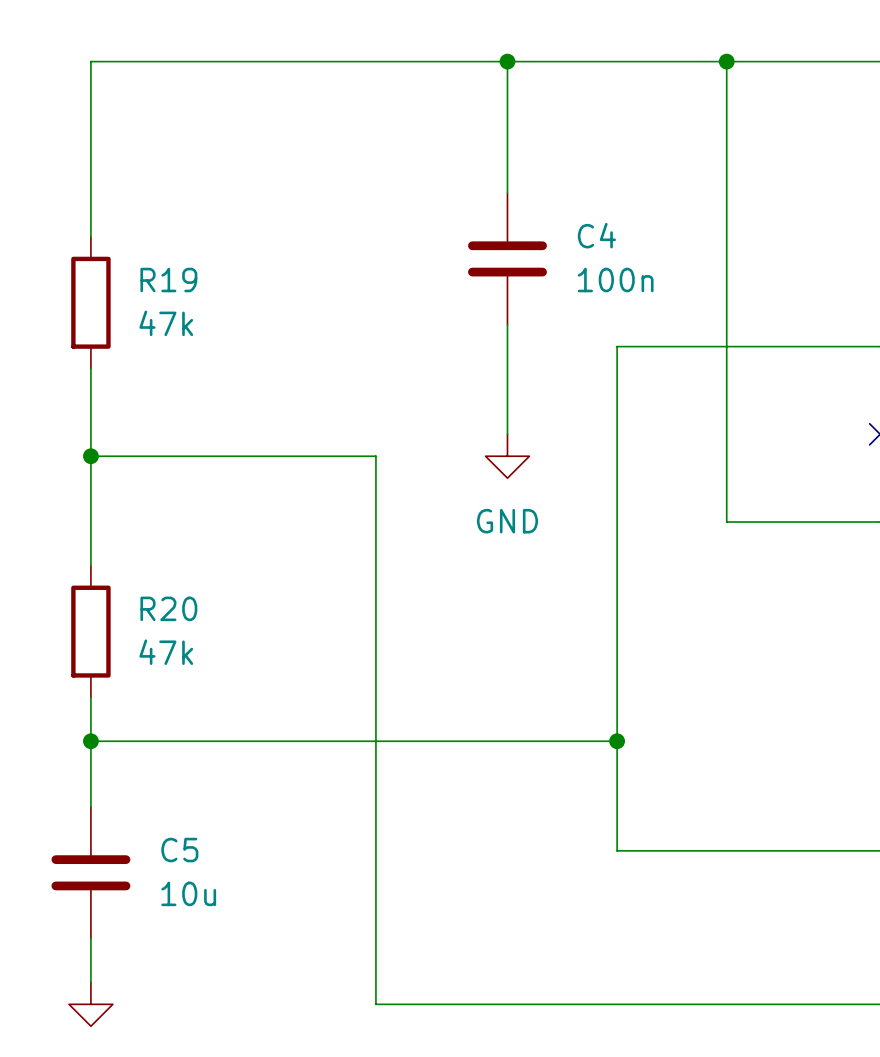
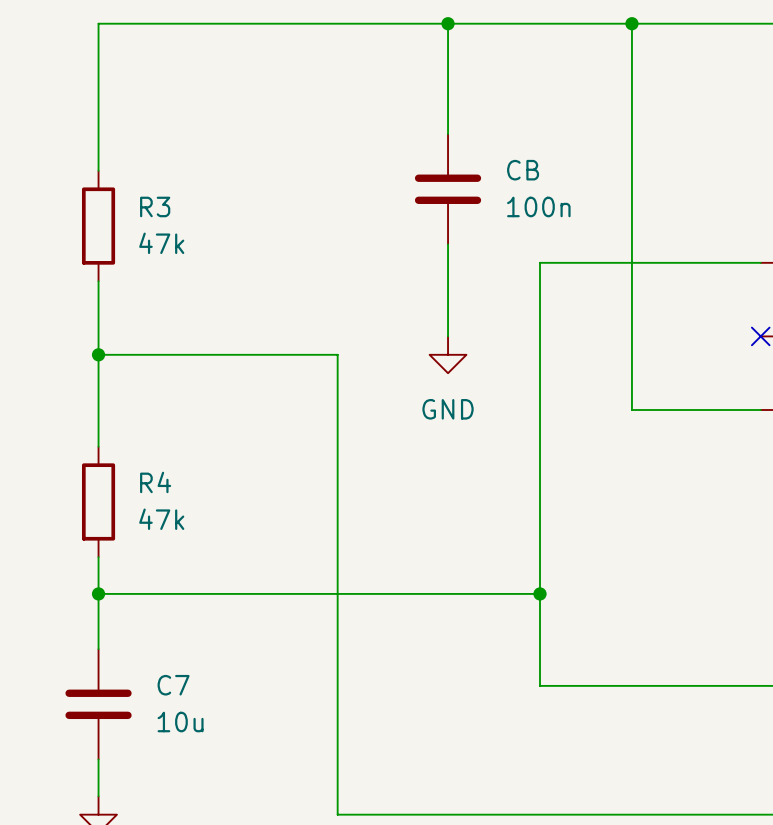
C4 name: C4 (596, 235) -> CB (523, 170)
R19 name: R19 (168, 280) -> R3 (155, 206)
R20 name: R20 (168, 608) -> R4 (155, 482)
C5 name: C5 (179, 850) -> C7 (173, 685)

